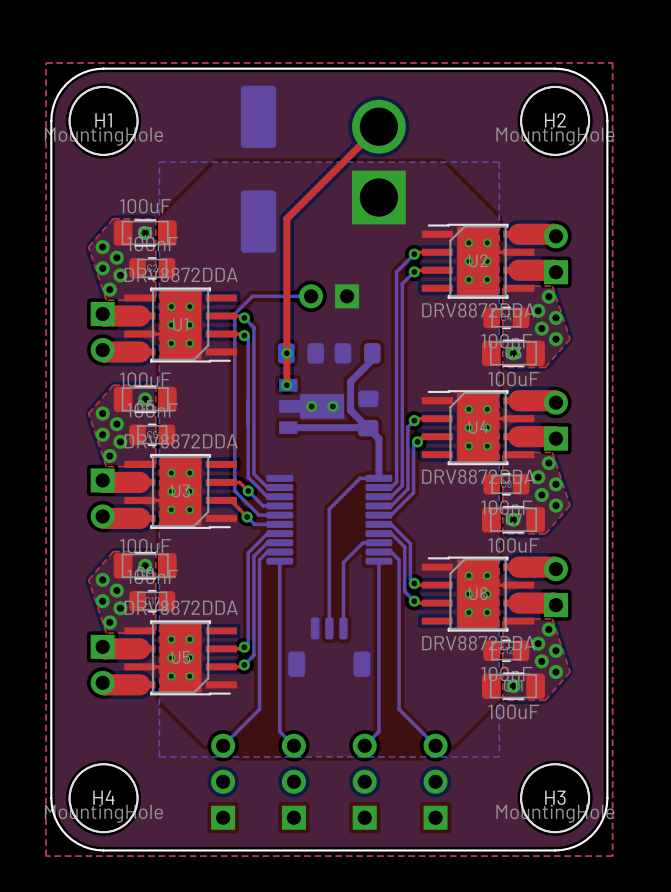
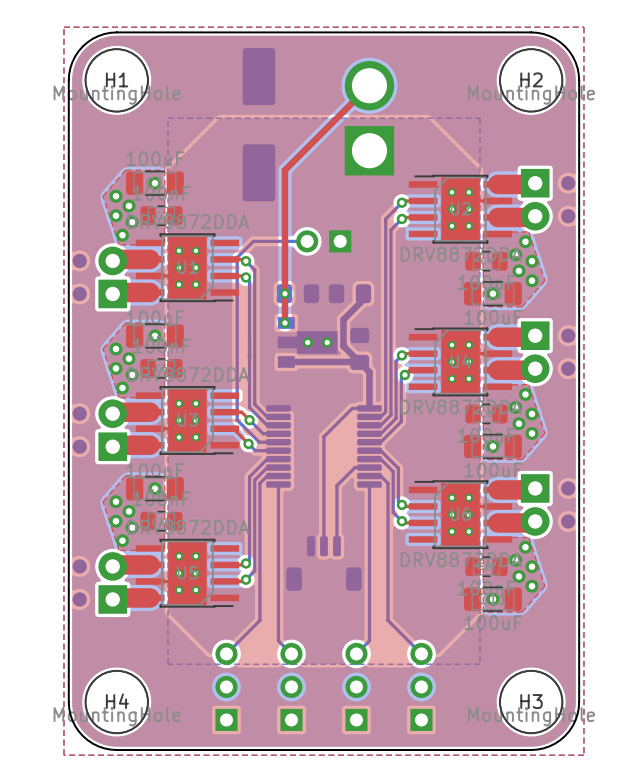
part: none -> (548, 199)
part: (555, 254) -> none
part: (102, 332) -> none
part: none -> (99, 277)
part: none -> (548, 352)
part: (555, 420) -> none
part: (102, 498) -> none
part: none -> (99, 430)
part: none -> (548, 504)
part: (555, 587) -> none
part: (102, 664) -> none
part: none -> (99, 582)

